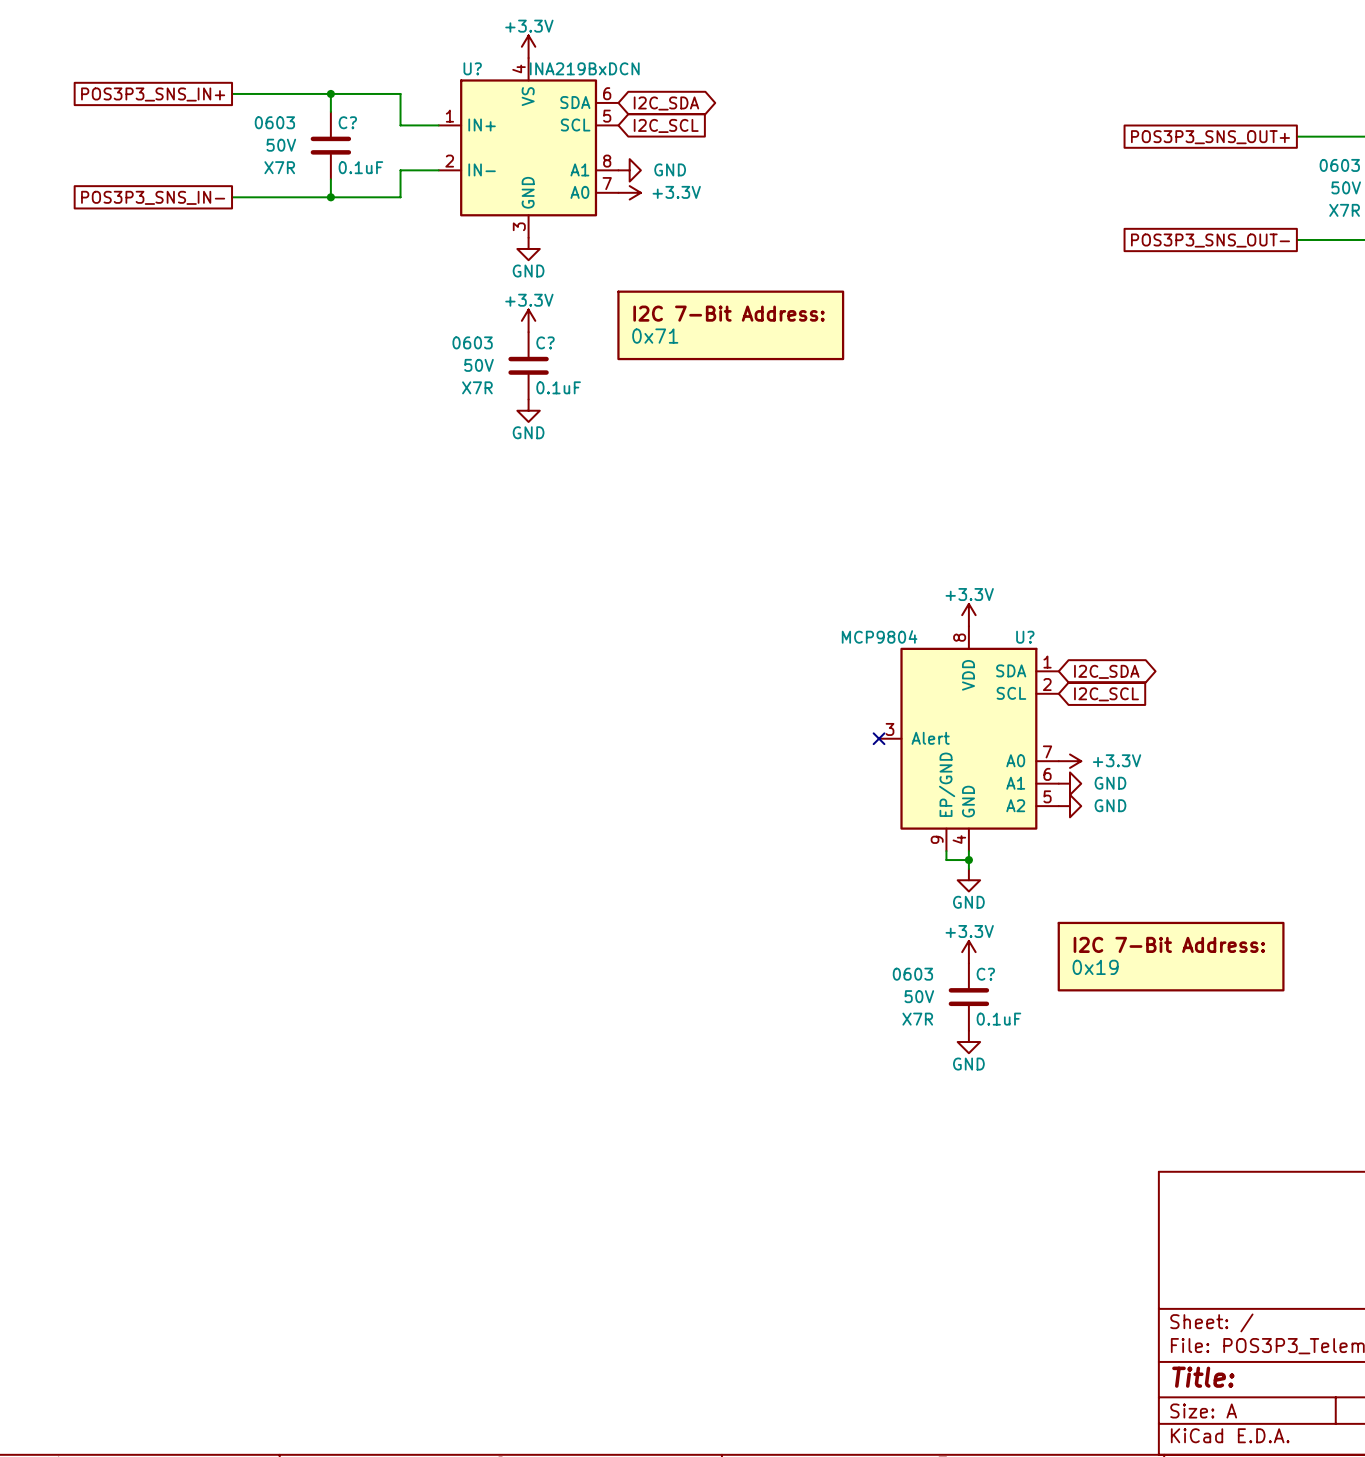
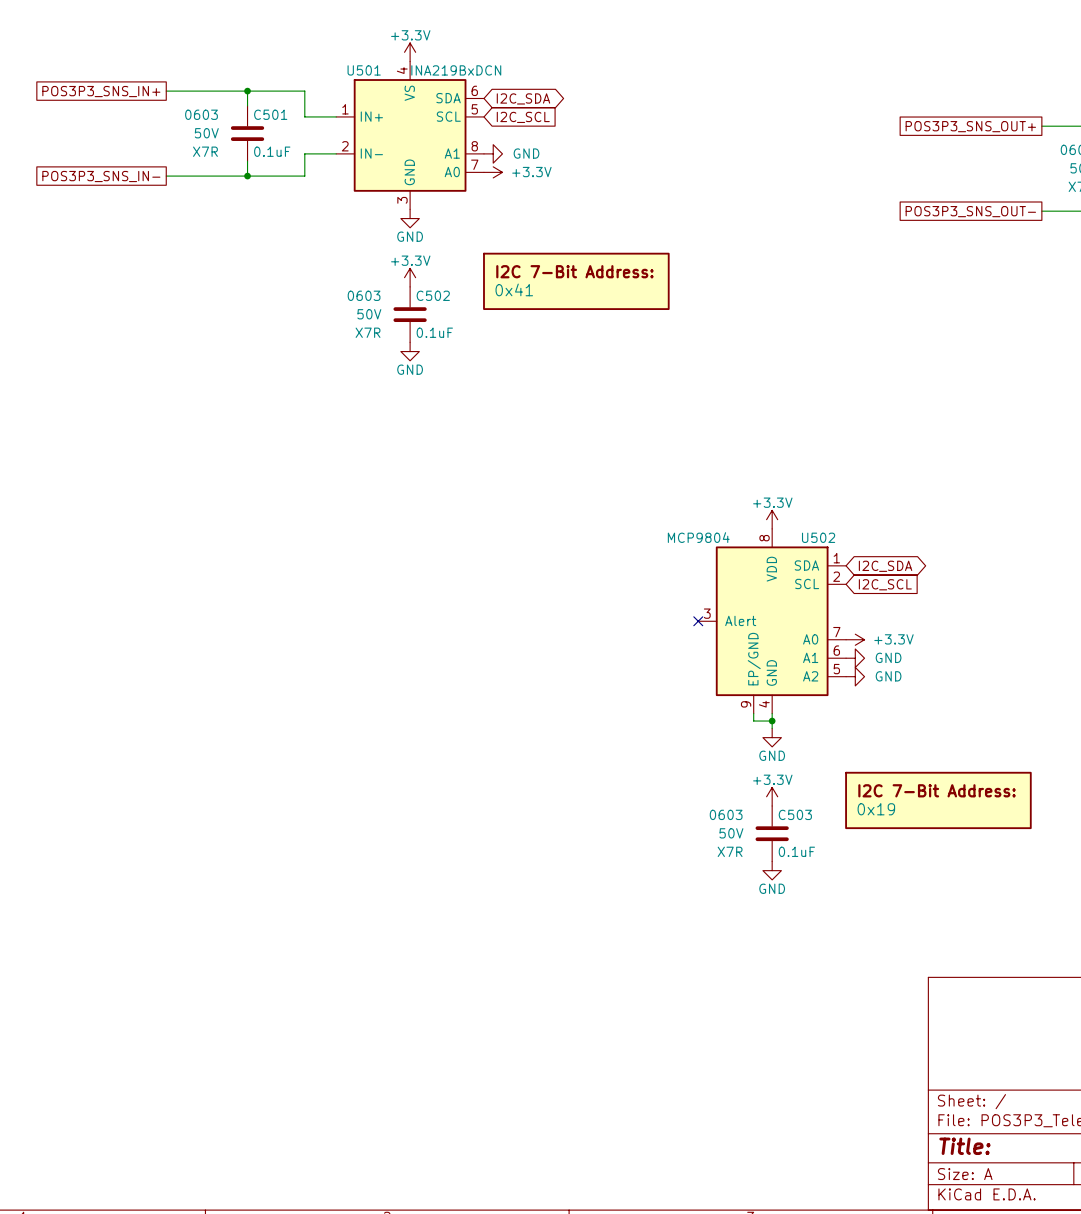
U? name: U? (472, 68) -> U501 (364, 70)
C? name: C? (347, 122) -> C501 (270, 114)
part value: 0x71 (655, 336) -> 0x41 (514, 289)
C? name: C? (545, 342) -> C502 (433, 295)
U? name: U? (1025, 637) -> U502 (818, 537)
C? name: C? (985, 974) -> C503 (795, 814)

